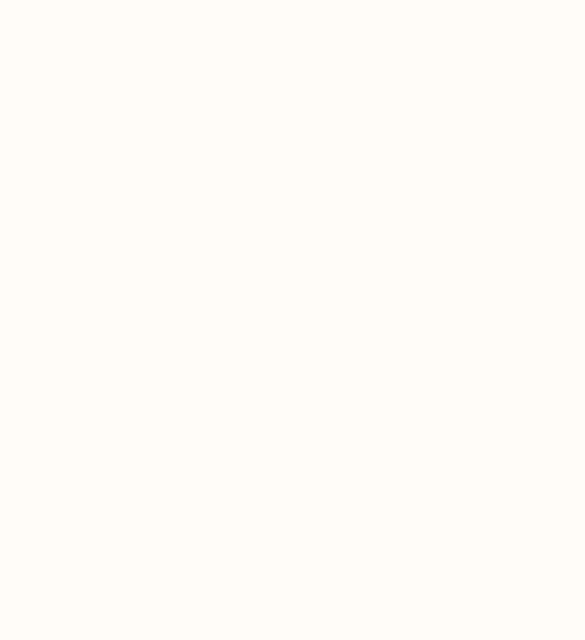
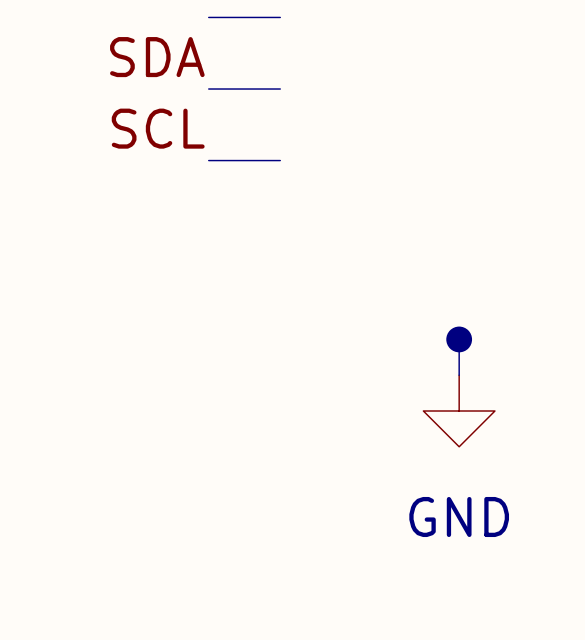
wire: none -> (208, 17) (280, 17)
label: none -> SDA (157, 57)
wire: none -> (208, 89) (280, 89)
label: none -> SCL (158, 128)
wire: none -> (208, 160) (280, 160)
wire: none -> (459, 339) (459, 375)
junction: none -> (459, 339)
power symbol: none -> GND (459, 411)

